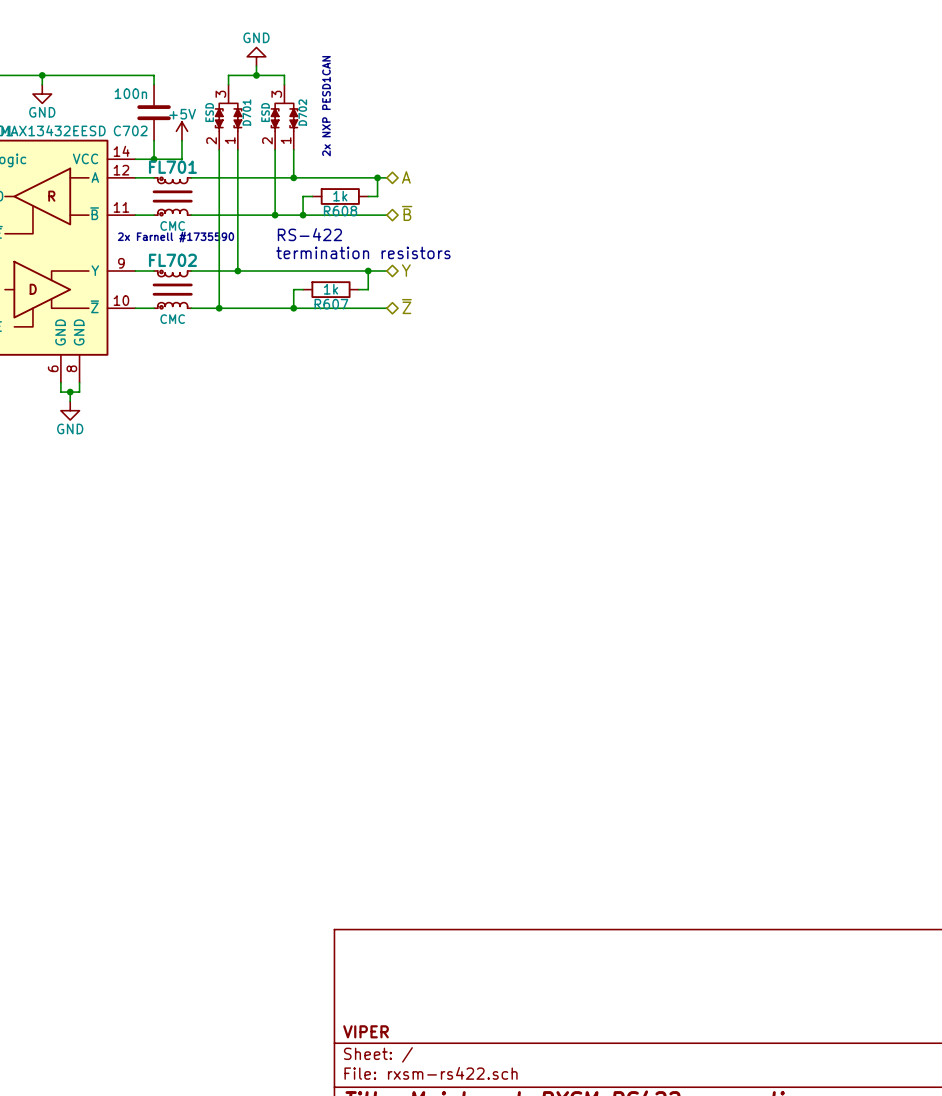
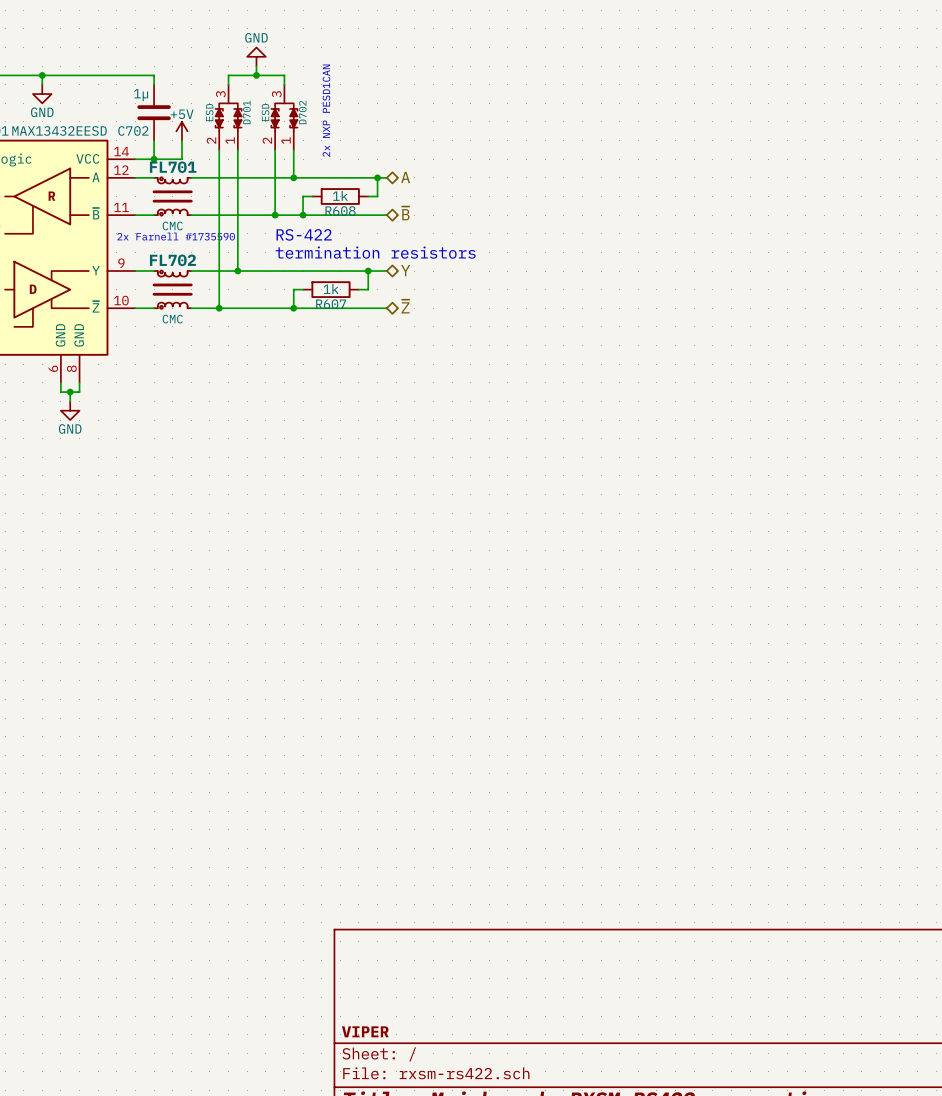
C702 value: 100n (130, 93) -> 1µ (141, 95)

